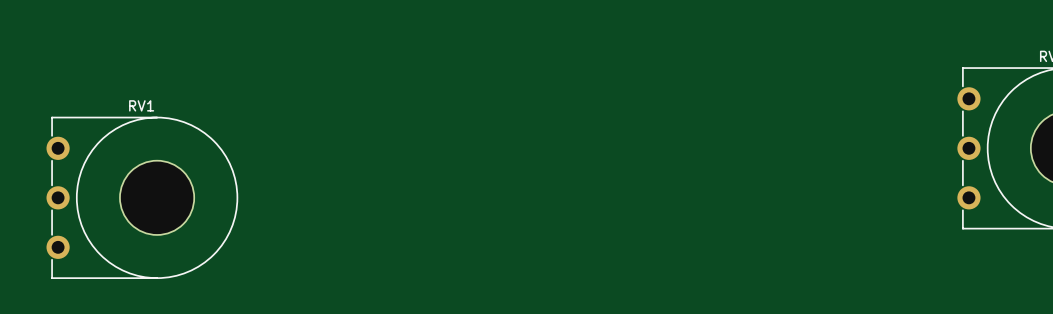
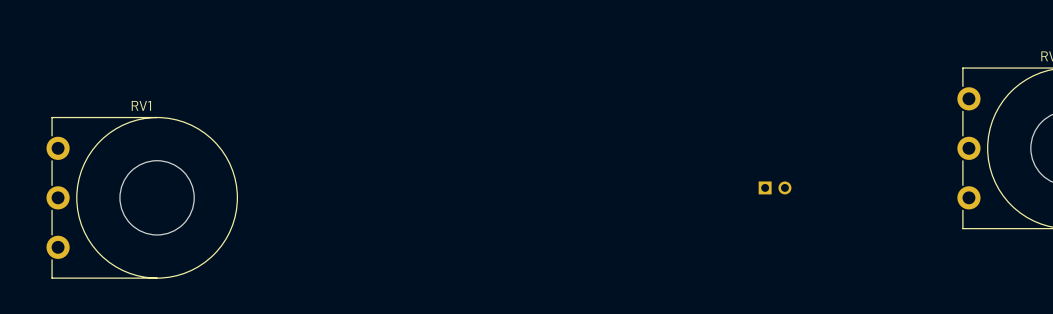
part: none -> (775, 187)

